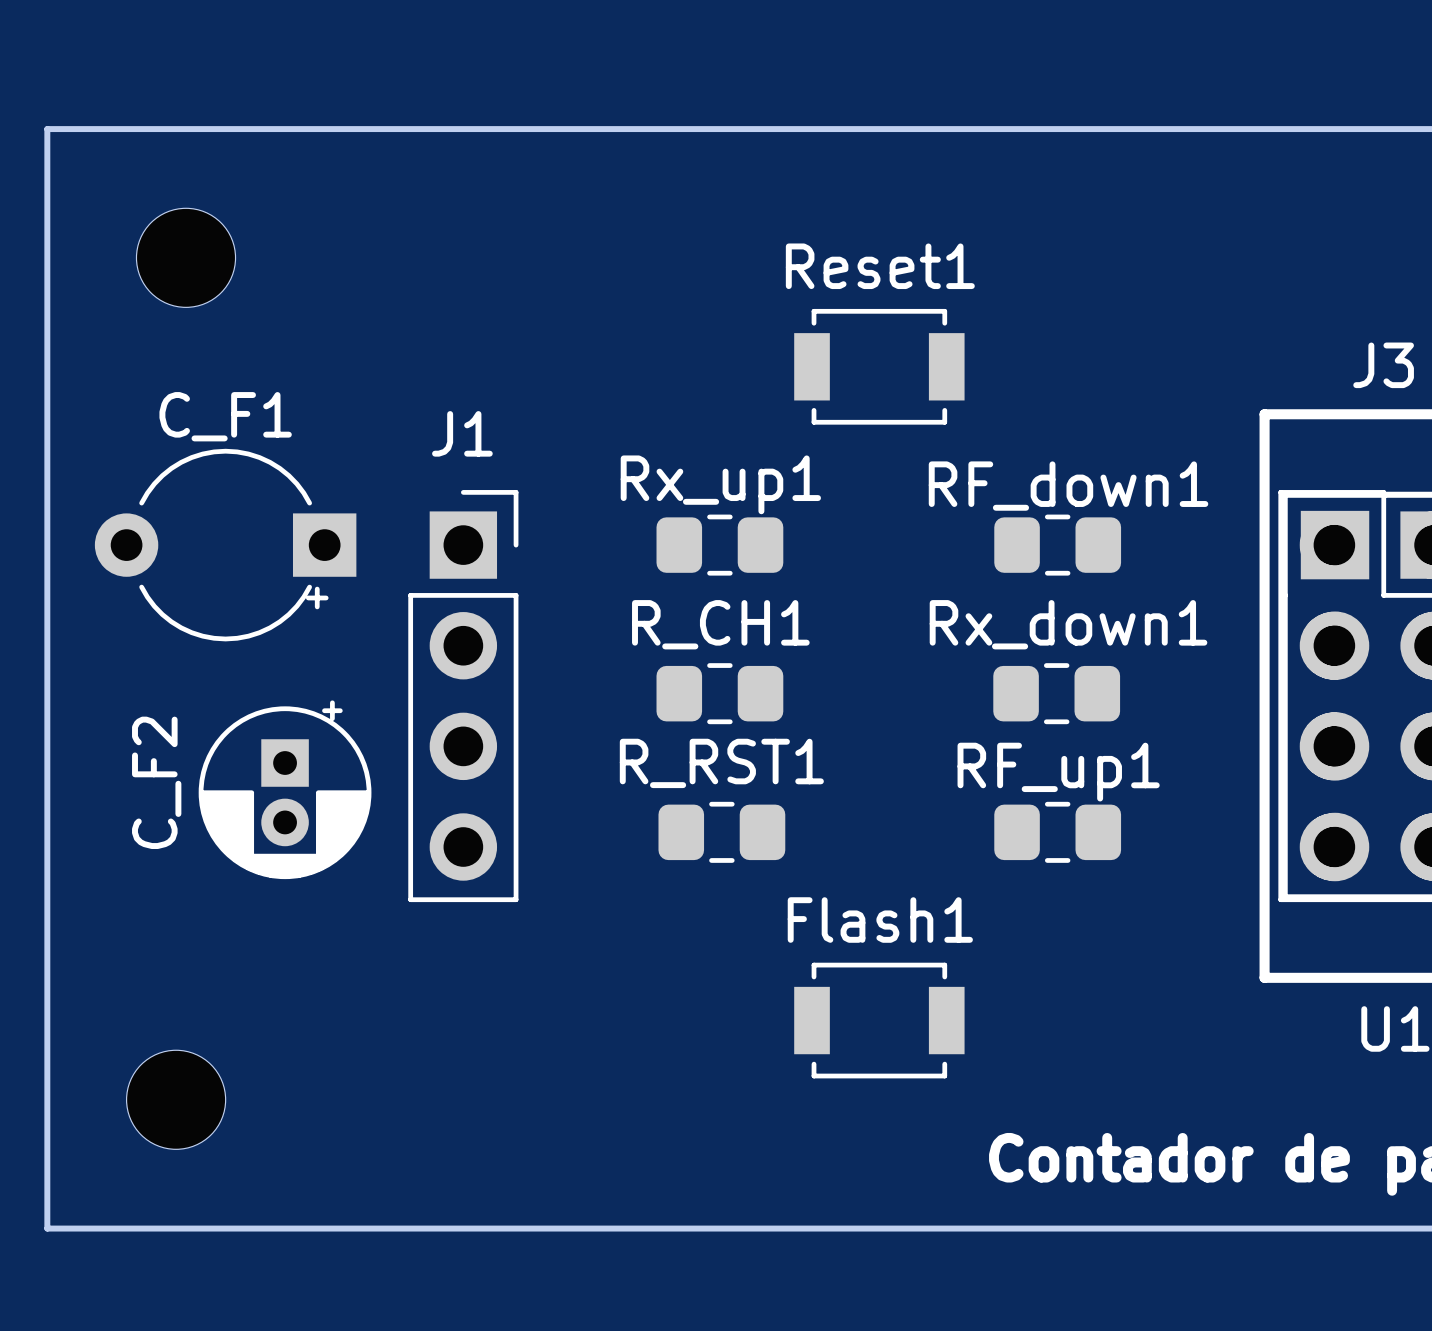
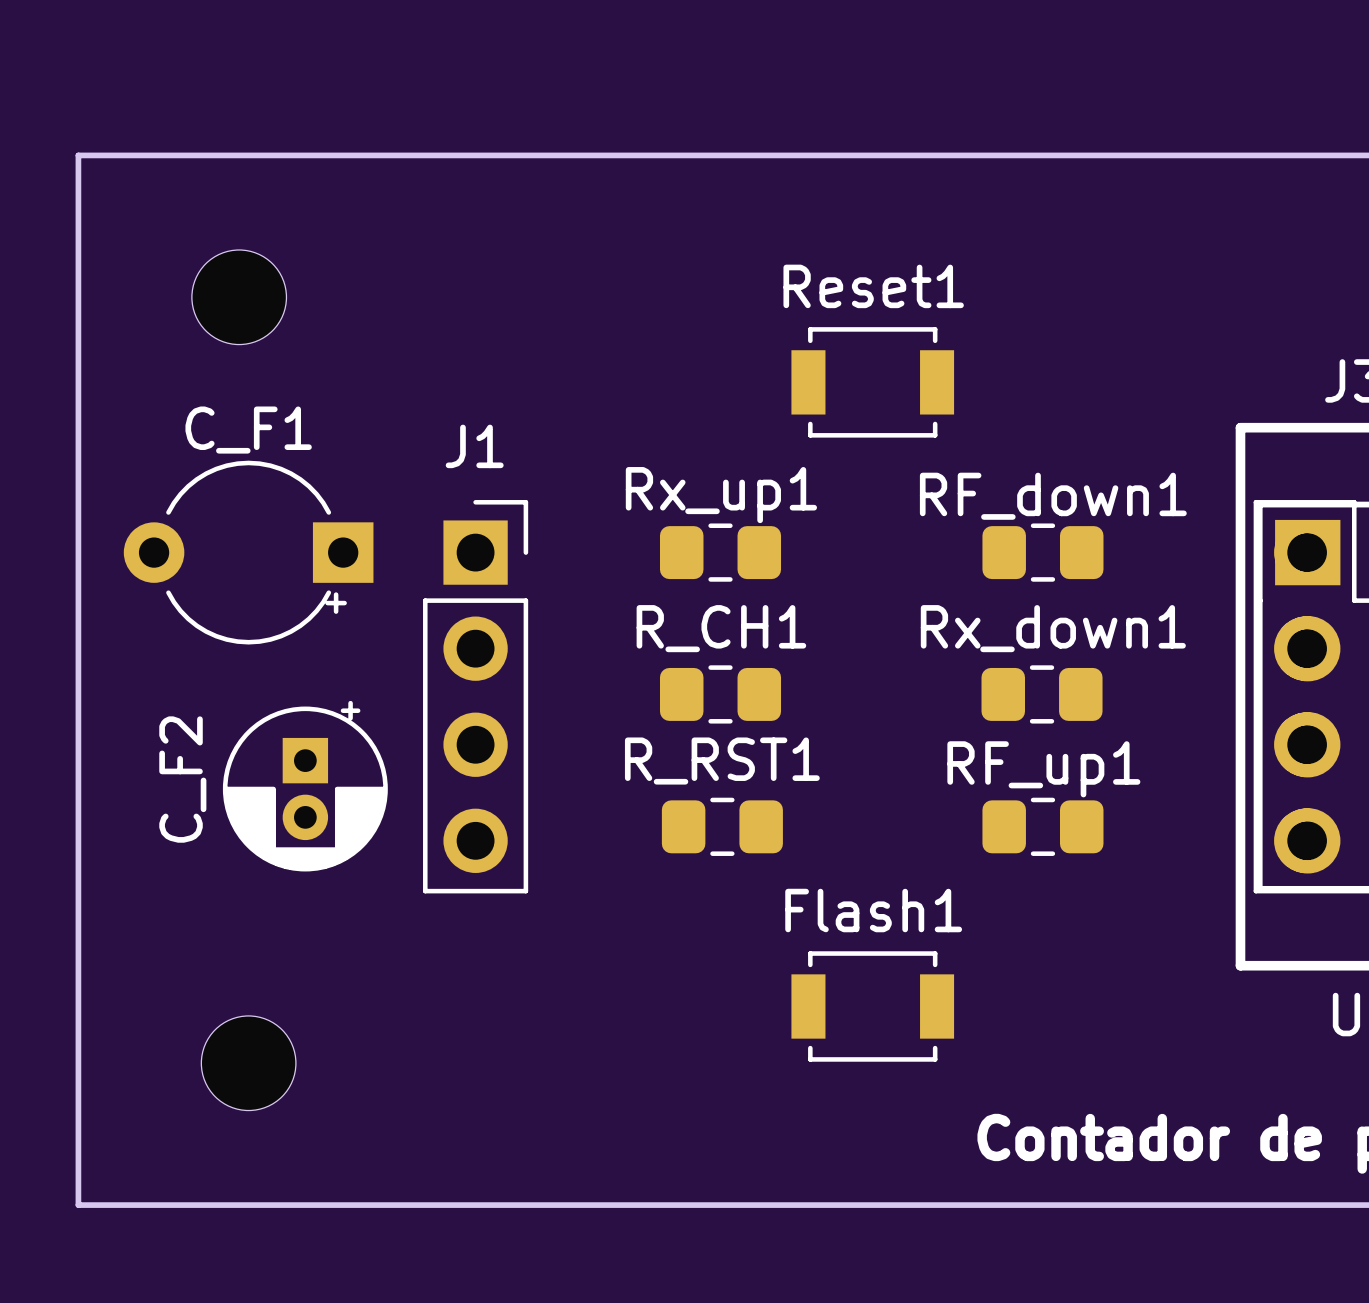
part position: (186, 257) -> (239, 297)
part position: (176, 1099) -> (248, 1063)

